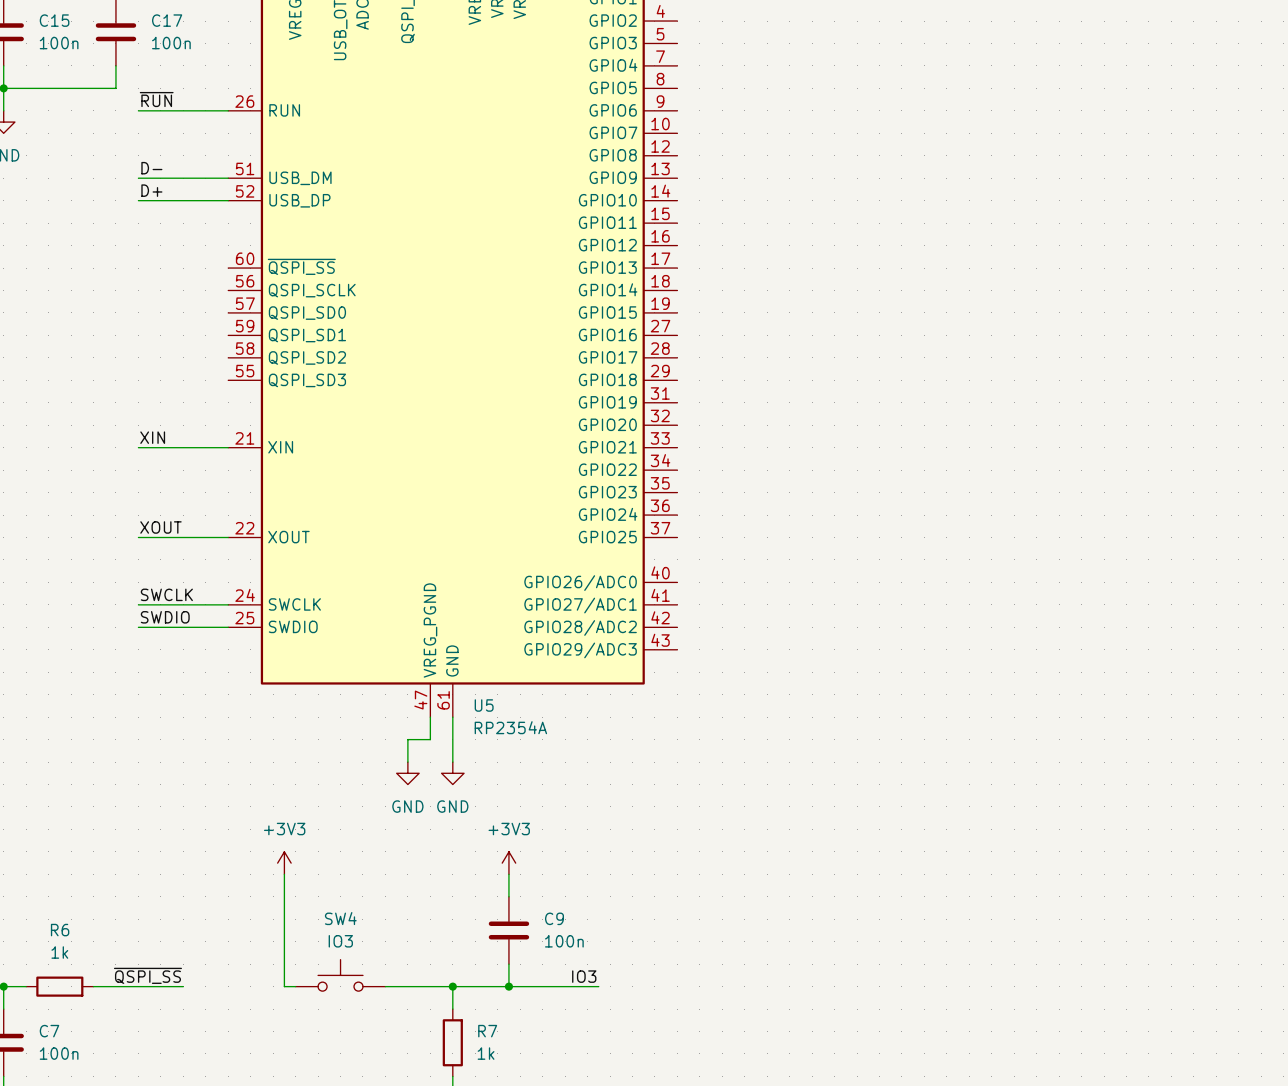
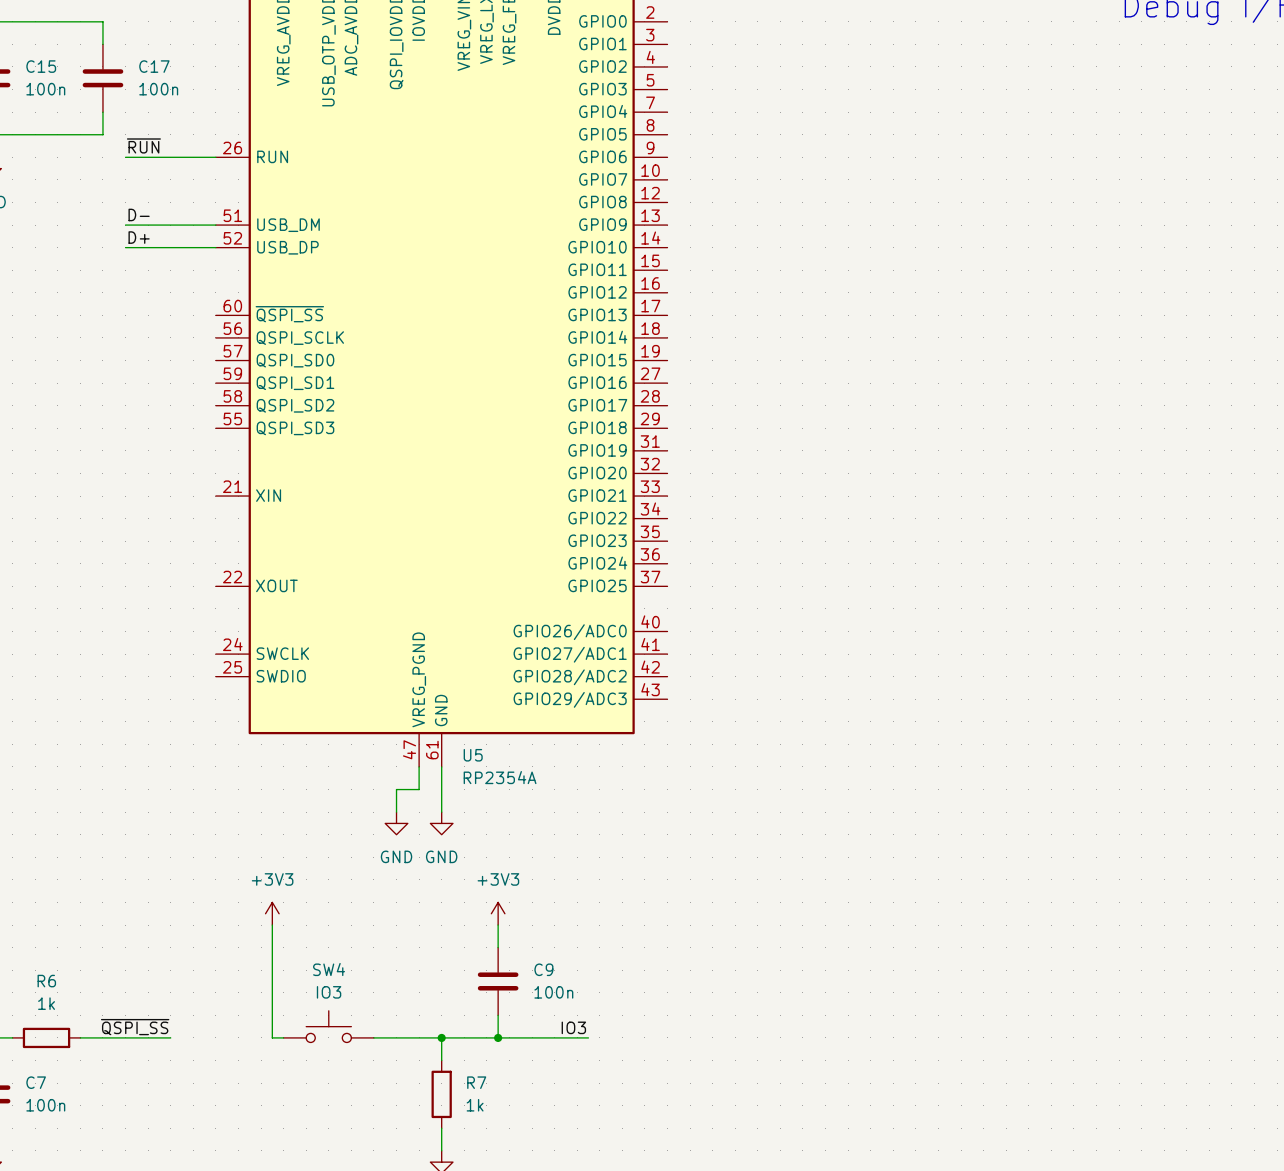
label: XIN (152, 437) -> none
wire: (138, 447) (228, 447) -> none
label: XOUT (160, 527) -> none
wire: (138, 537) (228, 537) -> none
label: SWCLK (166, 594) -> none
wire: (138, 604) (228, 604) -> none
label: SWDIO (165, 617) -> none
wire: (138, 627) (228, 627) -> none

